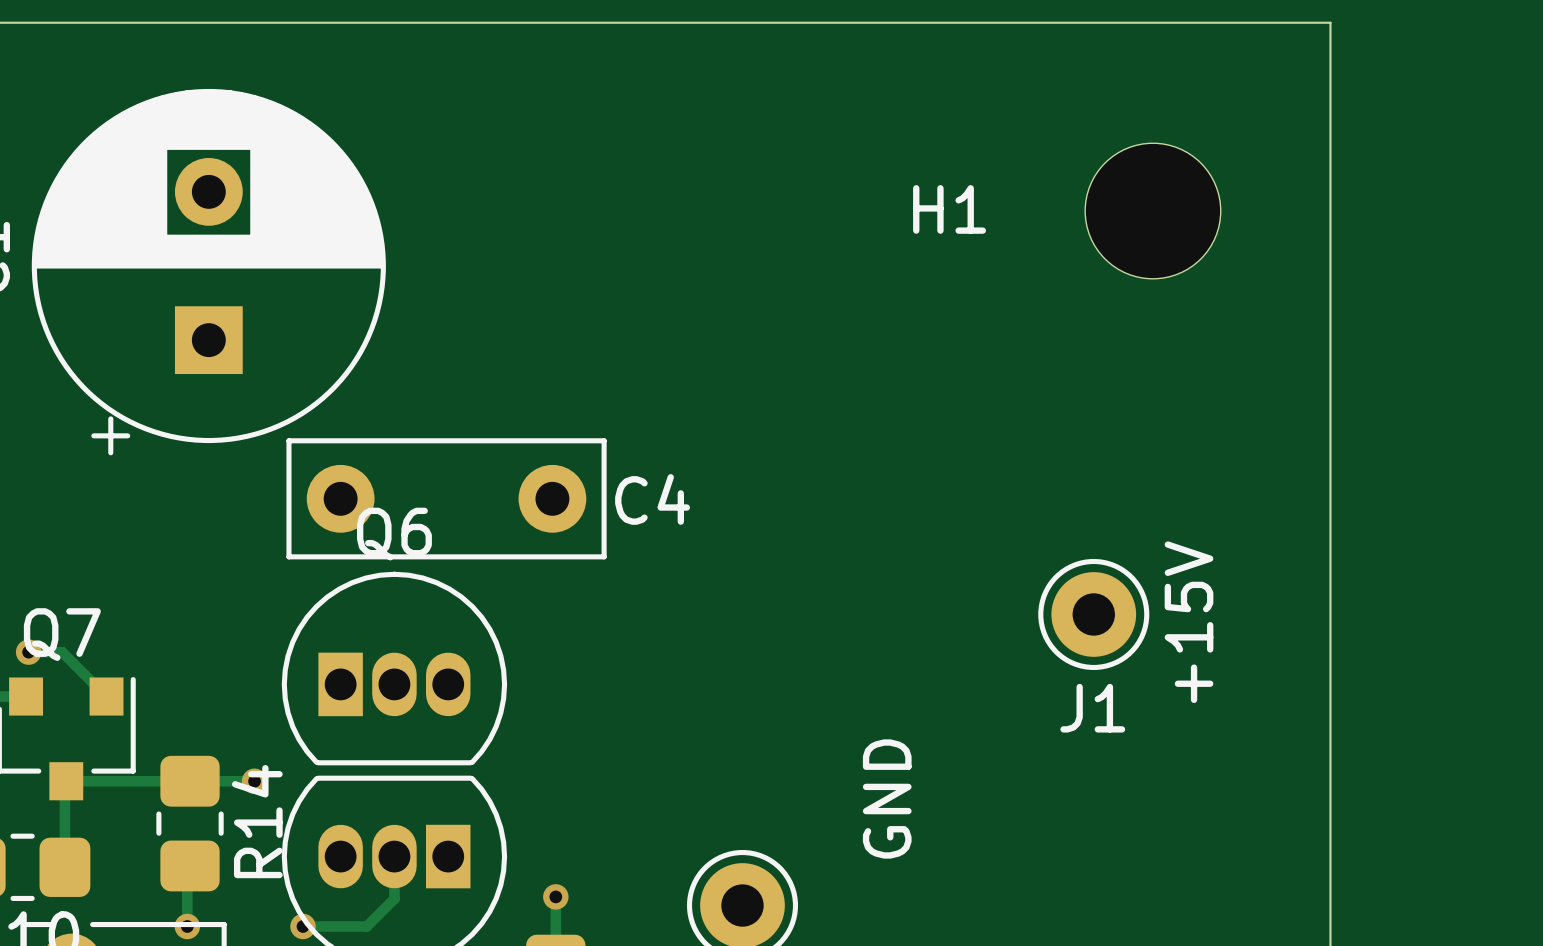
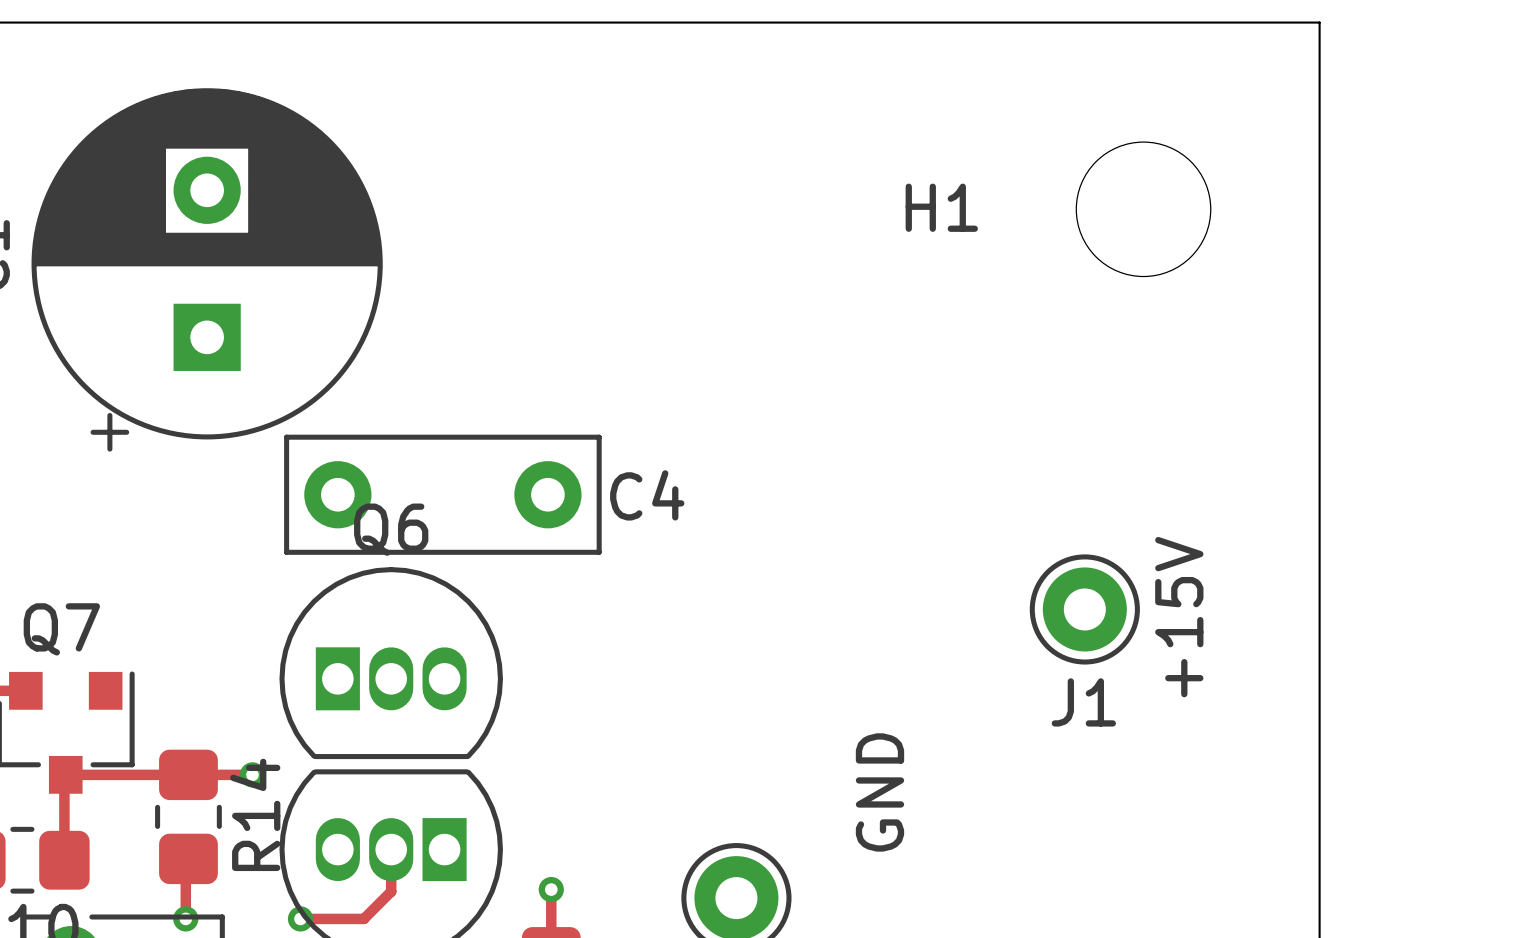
track: (28, 652) (62, 652) (106, 696) -> none
via: (28, 652) -> none

